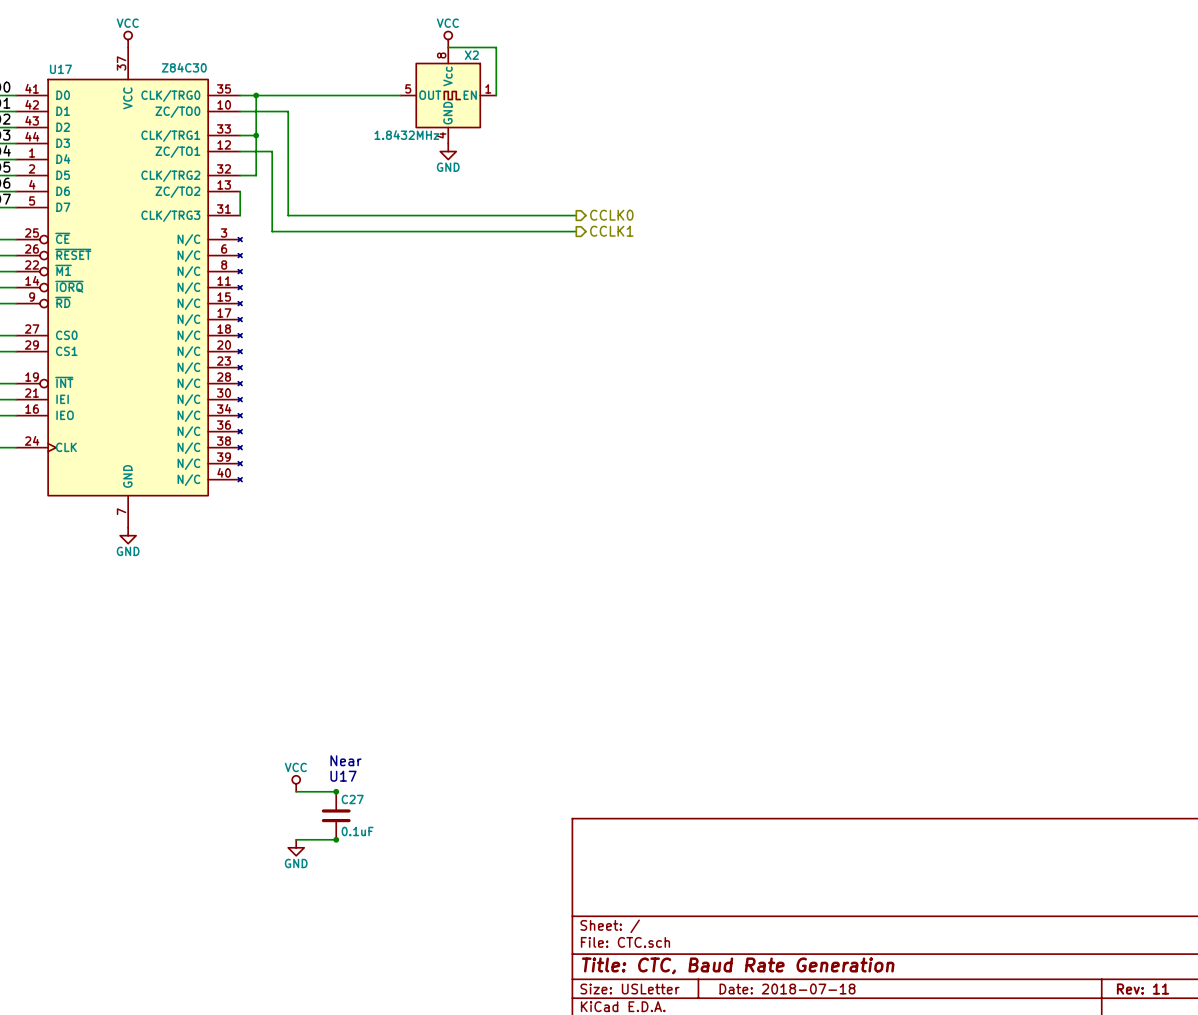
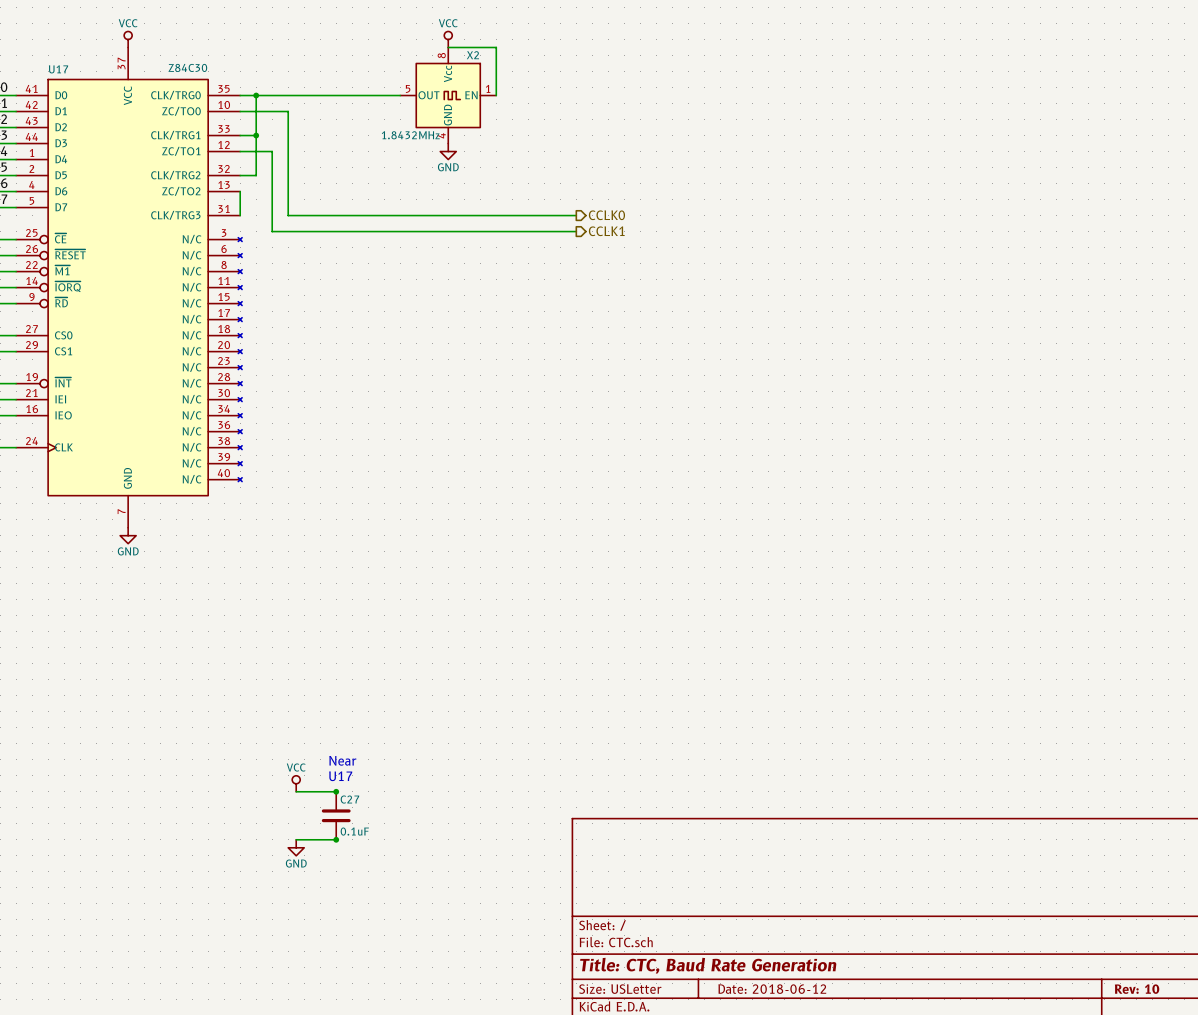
title block: Date: 2018-07-18 (787, 989) -> Date: 2018-06-12 (772, 989)
title block: Rev: 11 (1143, 989) -> Rev: 10 (1137, 989)

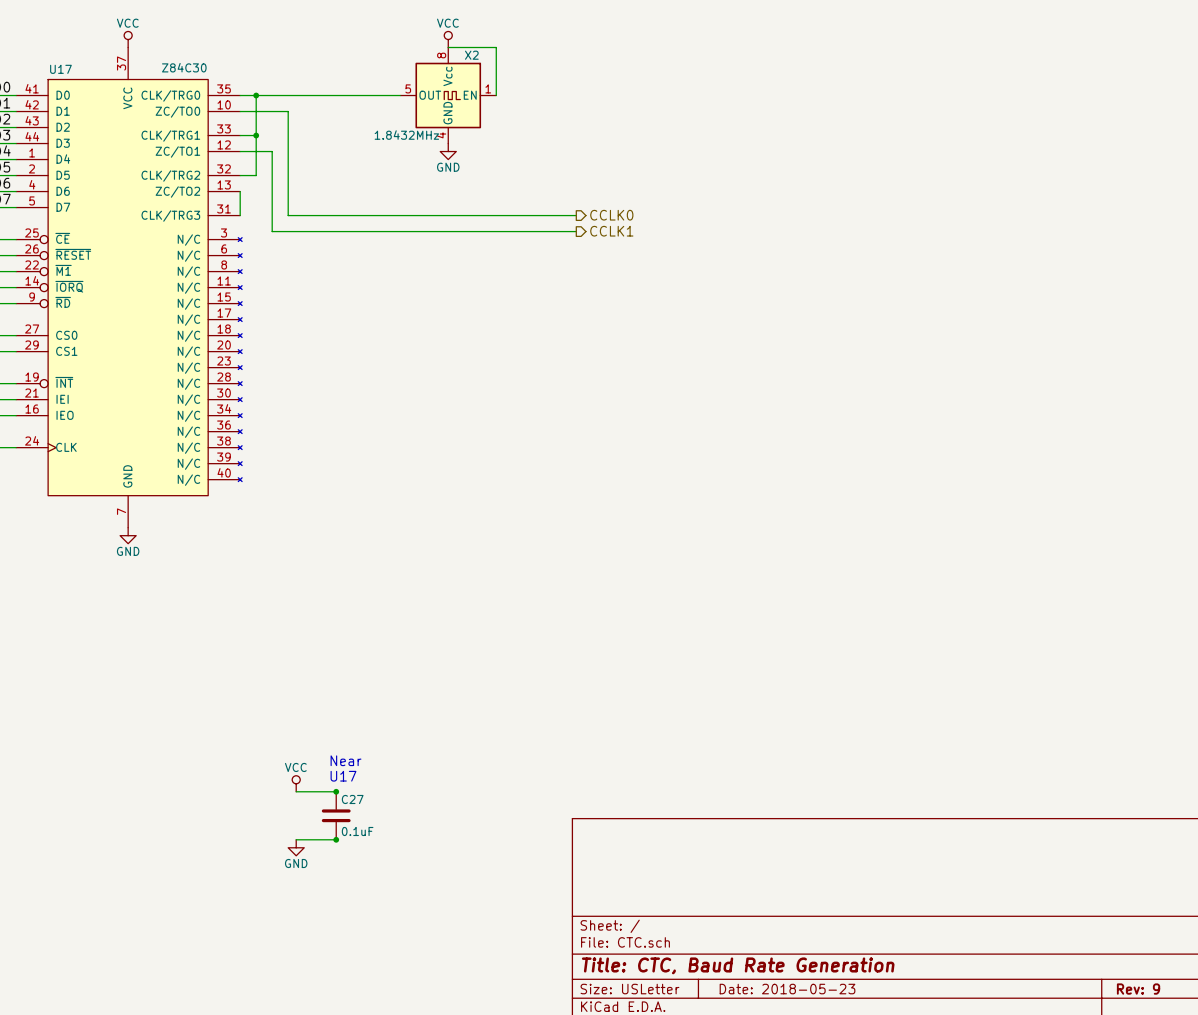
title block: Date: 2018-06-12 (772, 989) -> Date: 2018-05-23 (787, 989)
title block: Rev: 10 (1137, 989) -> Rev: 9 (1138, 989)

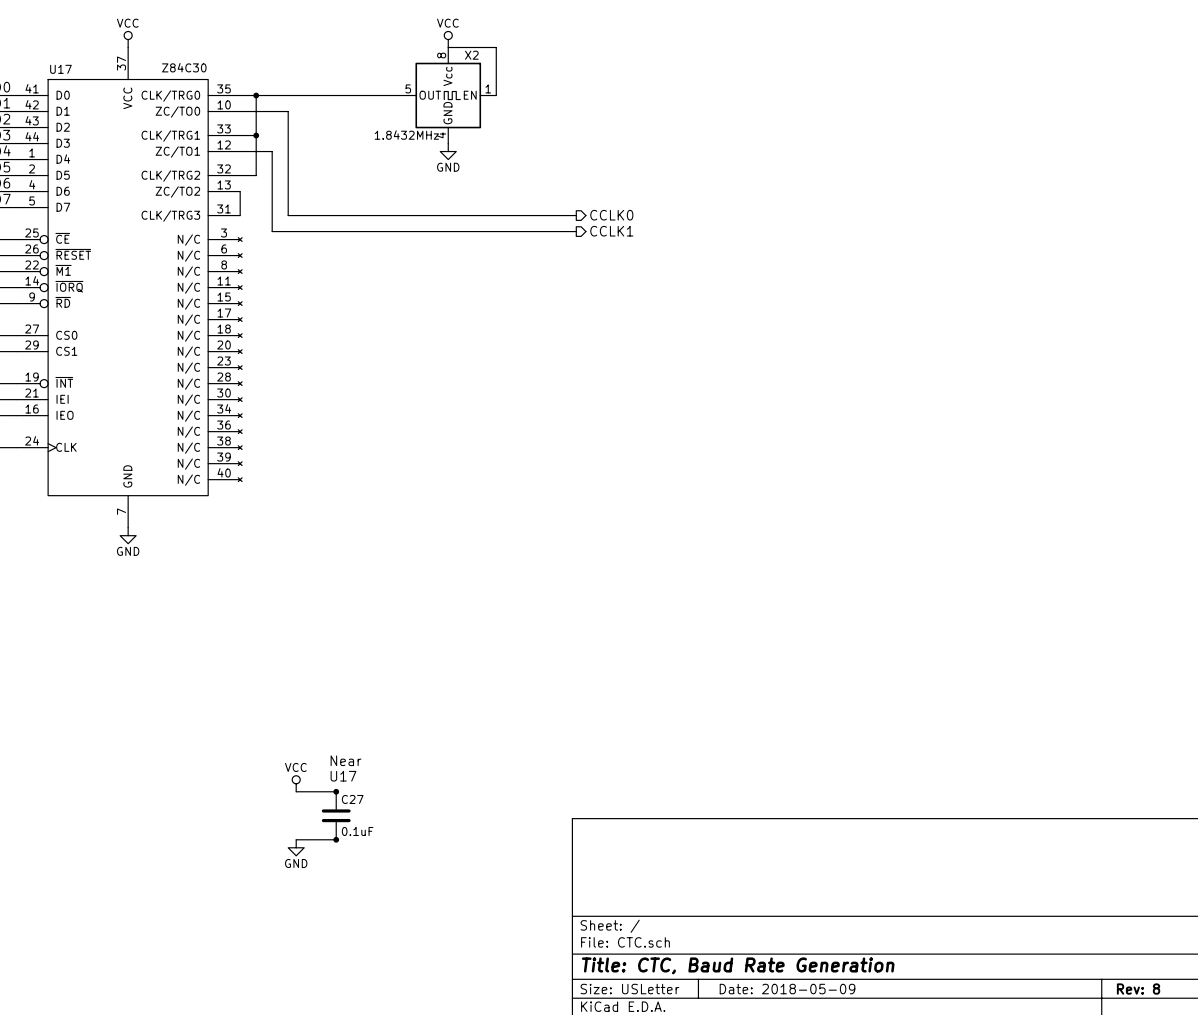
title block: Date: 2018-05-23 (787, 989) -> Date: 2018-05-09 (787, 989)
title block: Rev: 9 (1138, 989) -> Rev: 8 (1138, 989)

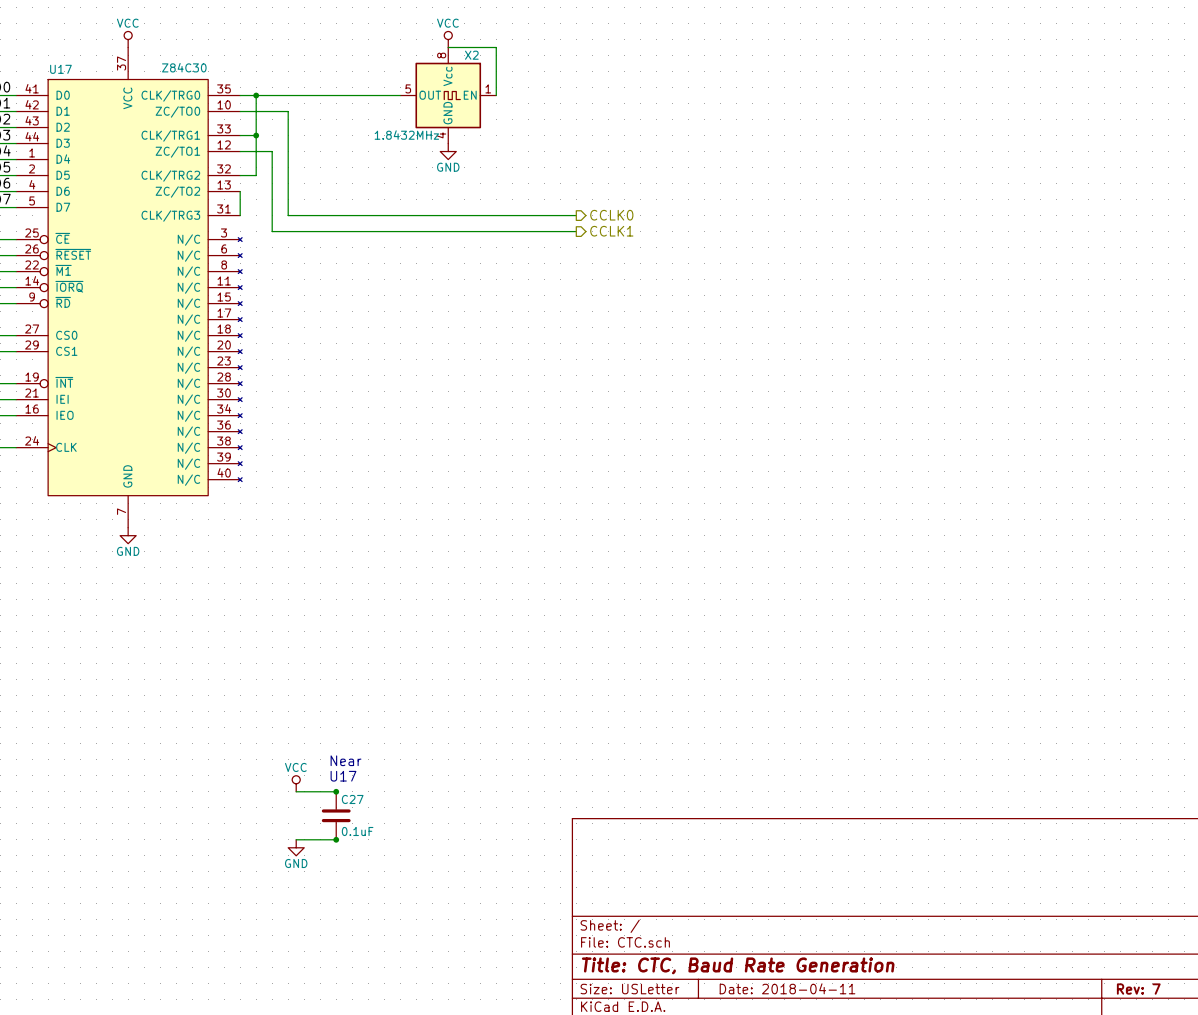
title block: Date: 2018-05-09 (787, 989) -> Date: 2018-04-11 (787, 988)
title block: Rev: 8 (1138, 989) -> Rev: 7 (1138, 989)

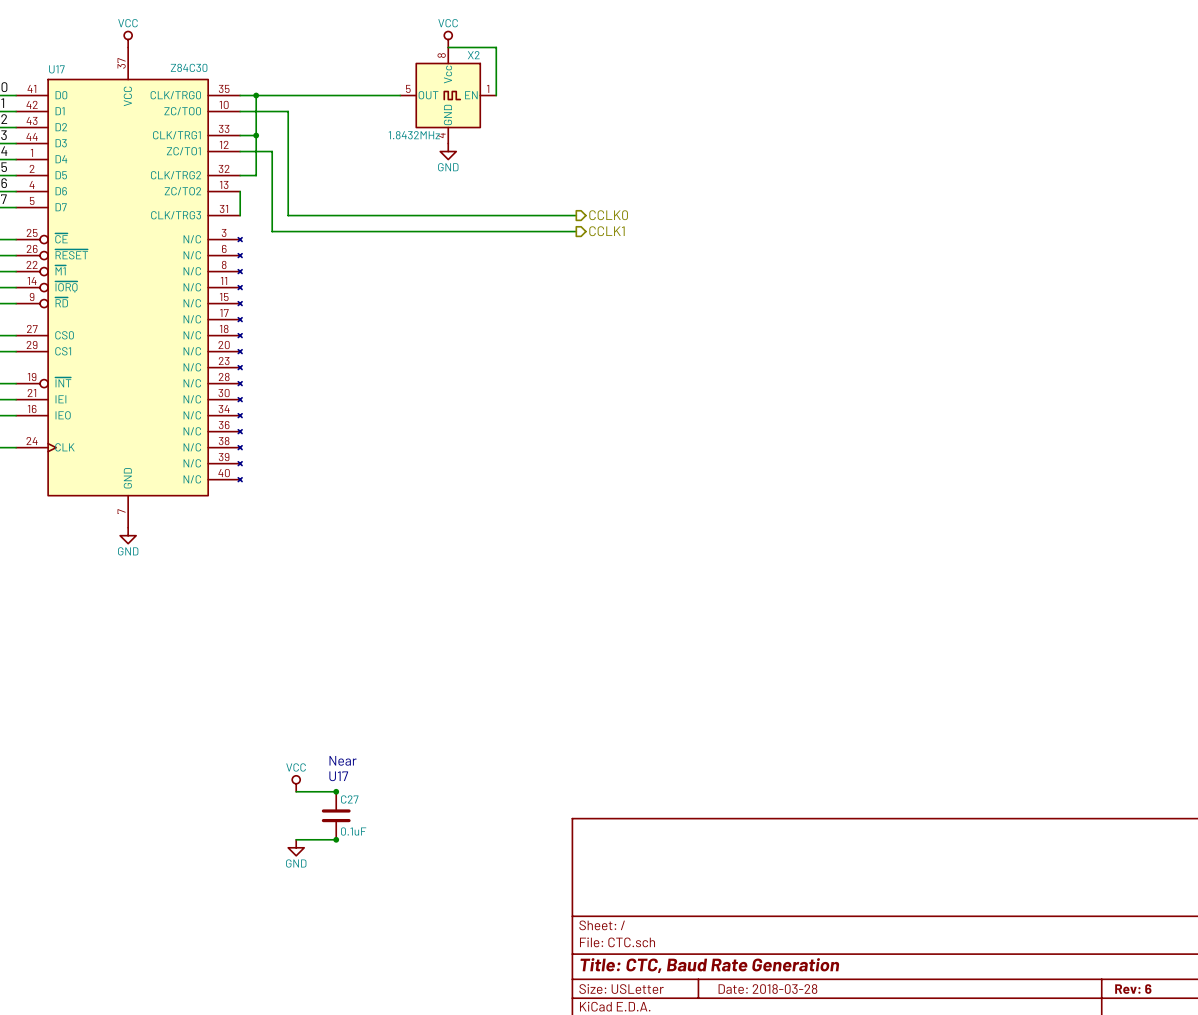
title block: Date: 2018-04-11 (787, 988) -> Date: 2018-03-28 (767, 989)
title block: Rev: 7 (1138, 989) -> Rev: 6 (1133, 989)

